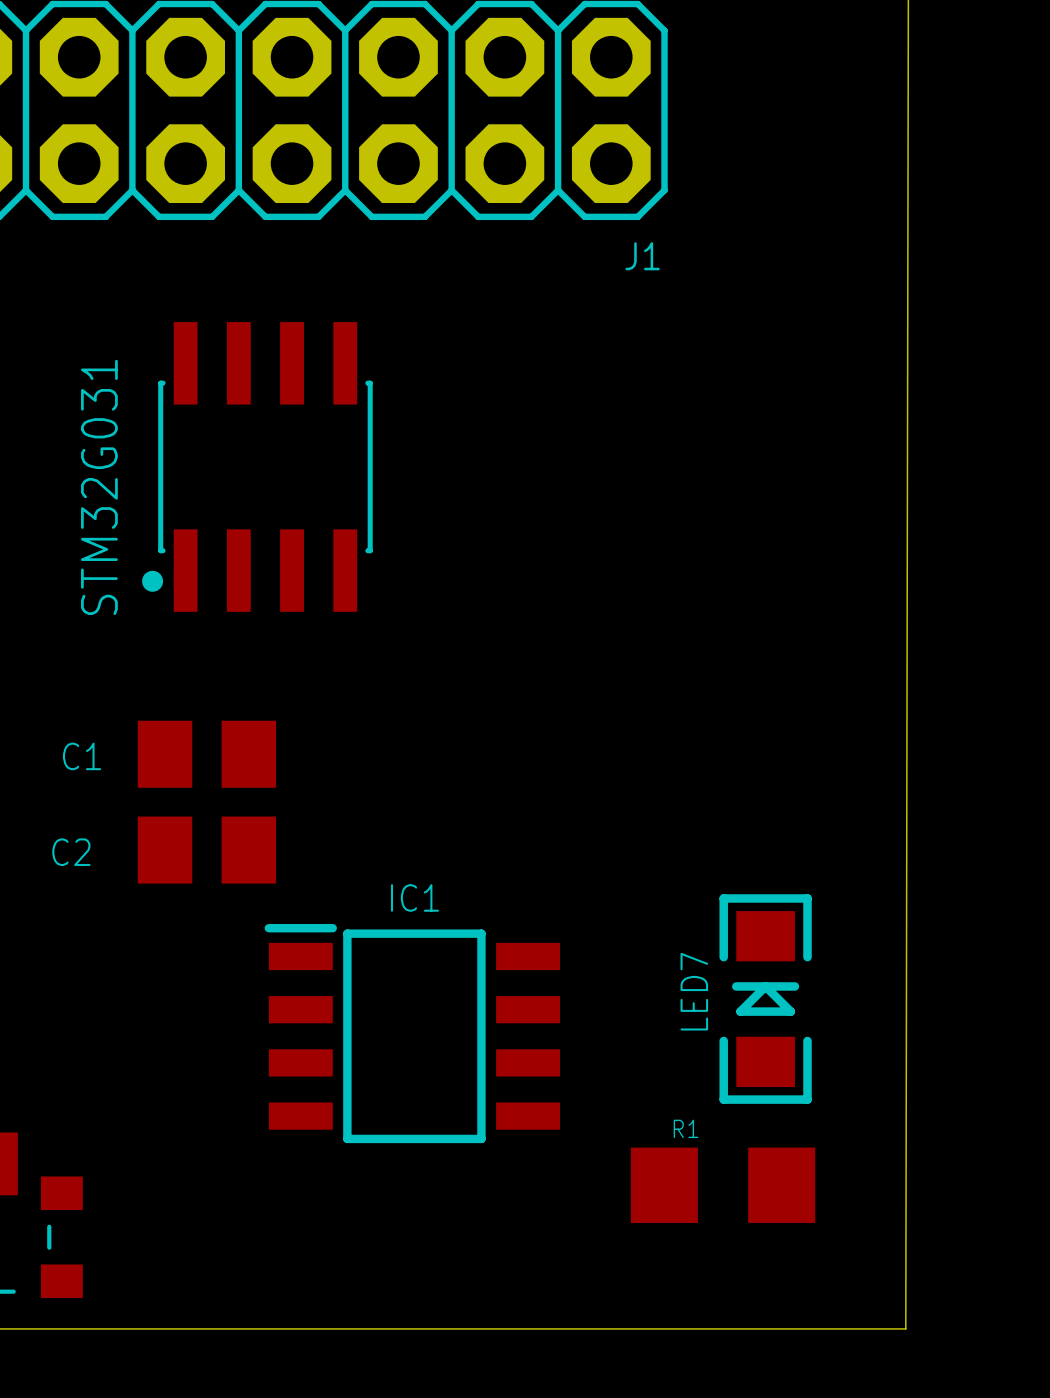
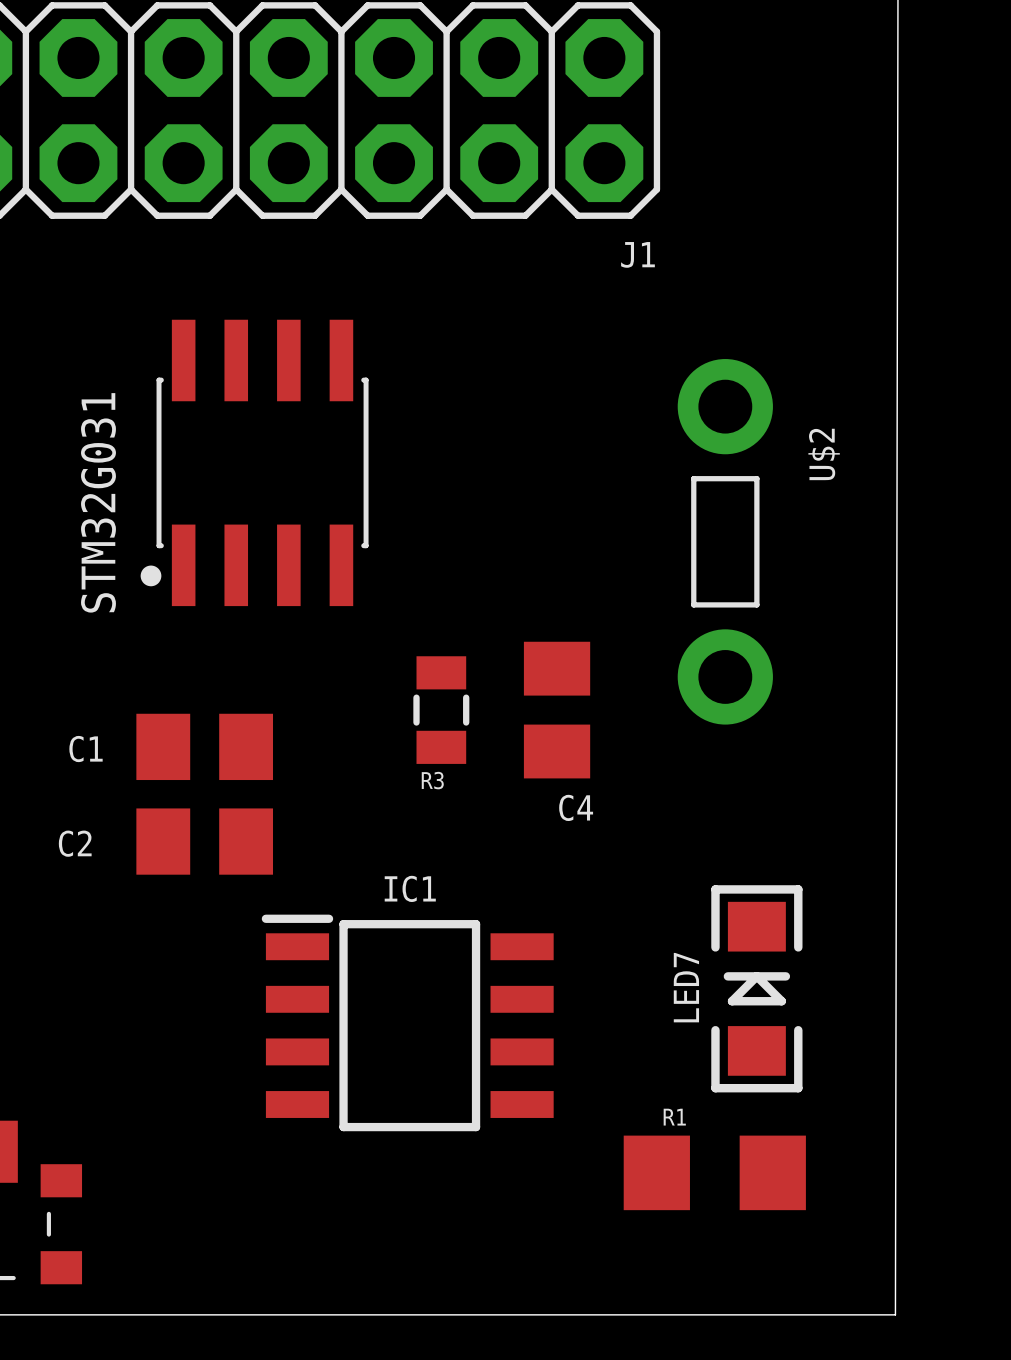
U$2: none -> (725, 541)
R3: none -> (441, 710)
C4: none -> (557, 710)

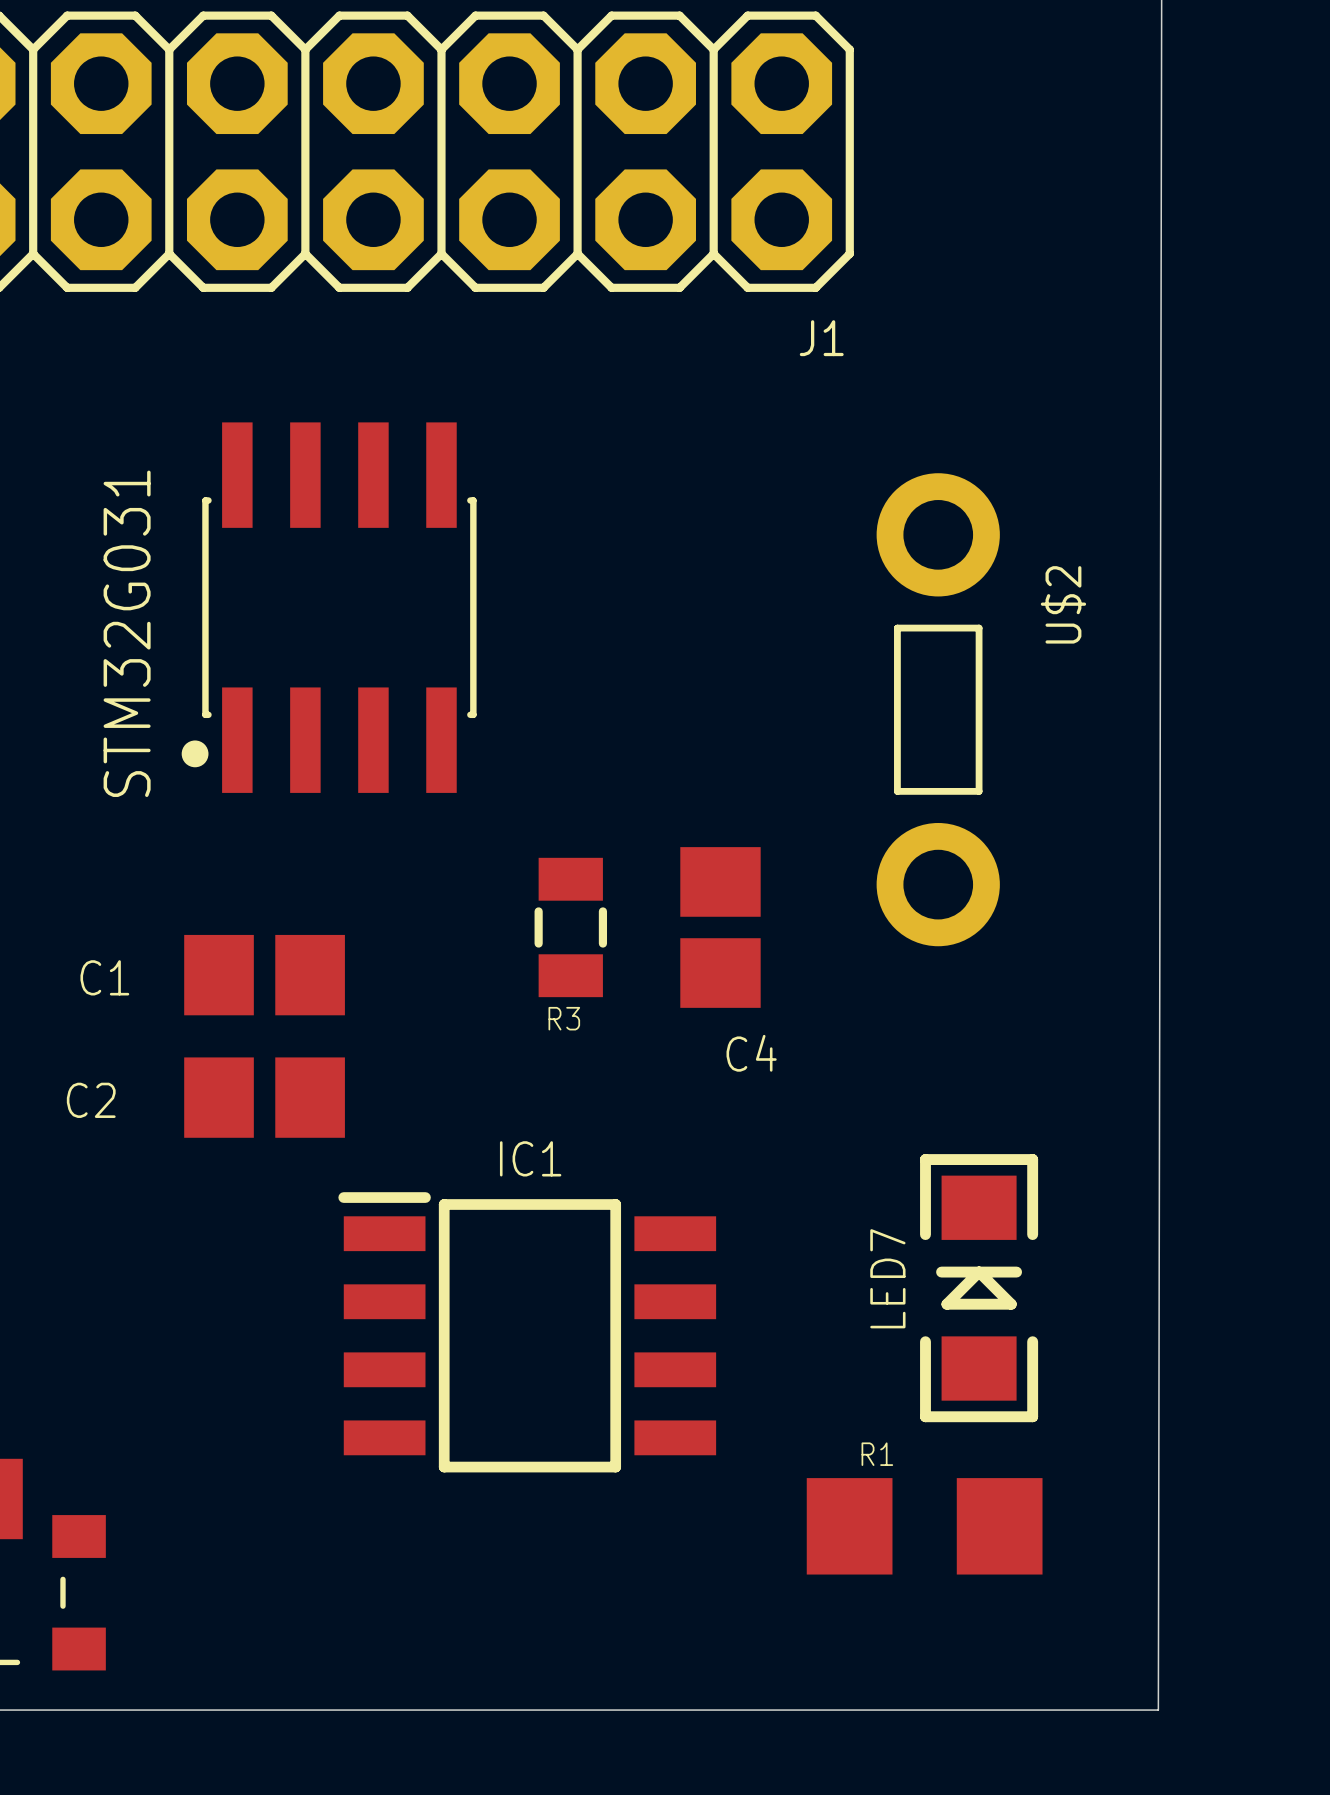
C4 footprint: [523, 641, 591, 779] -> [680, 847, 761, 1008]
C1 footprint: [136, 713, 274, 781] -> [184, 934, 345, 1016]
C2 footprint: [136, 808, 274, 875] -> [184, 1057, 345, 1138]

